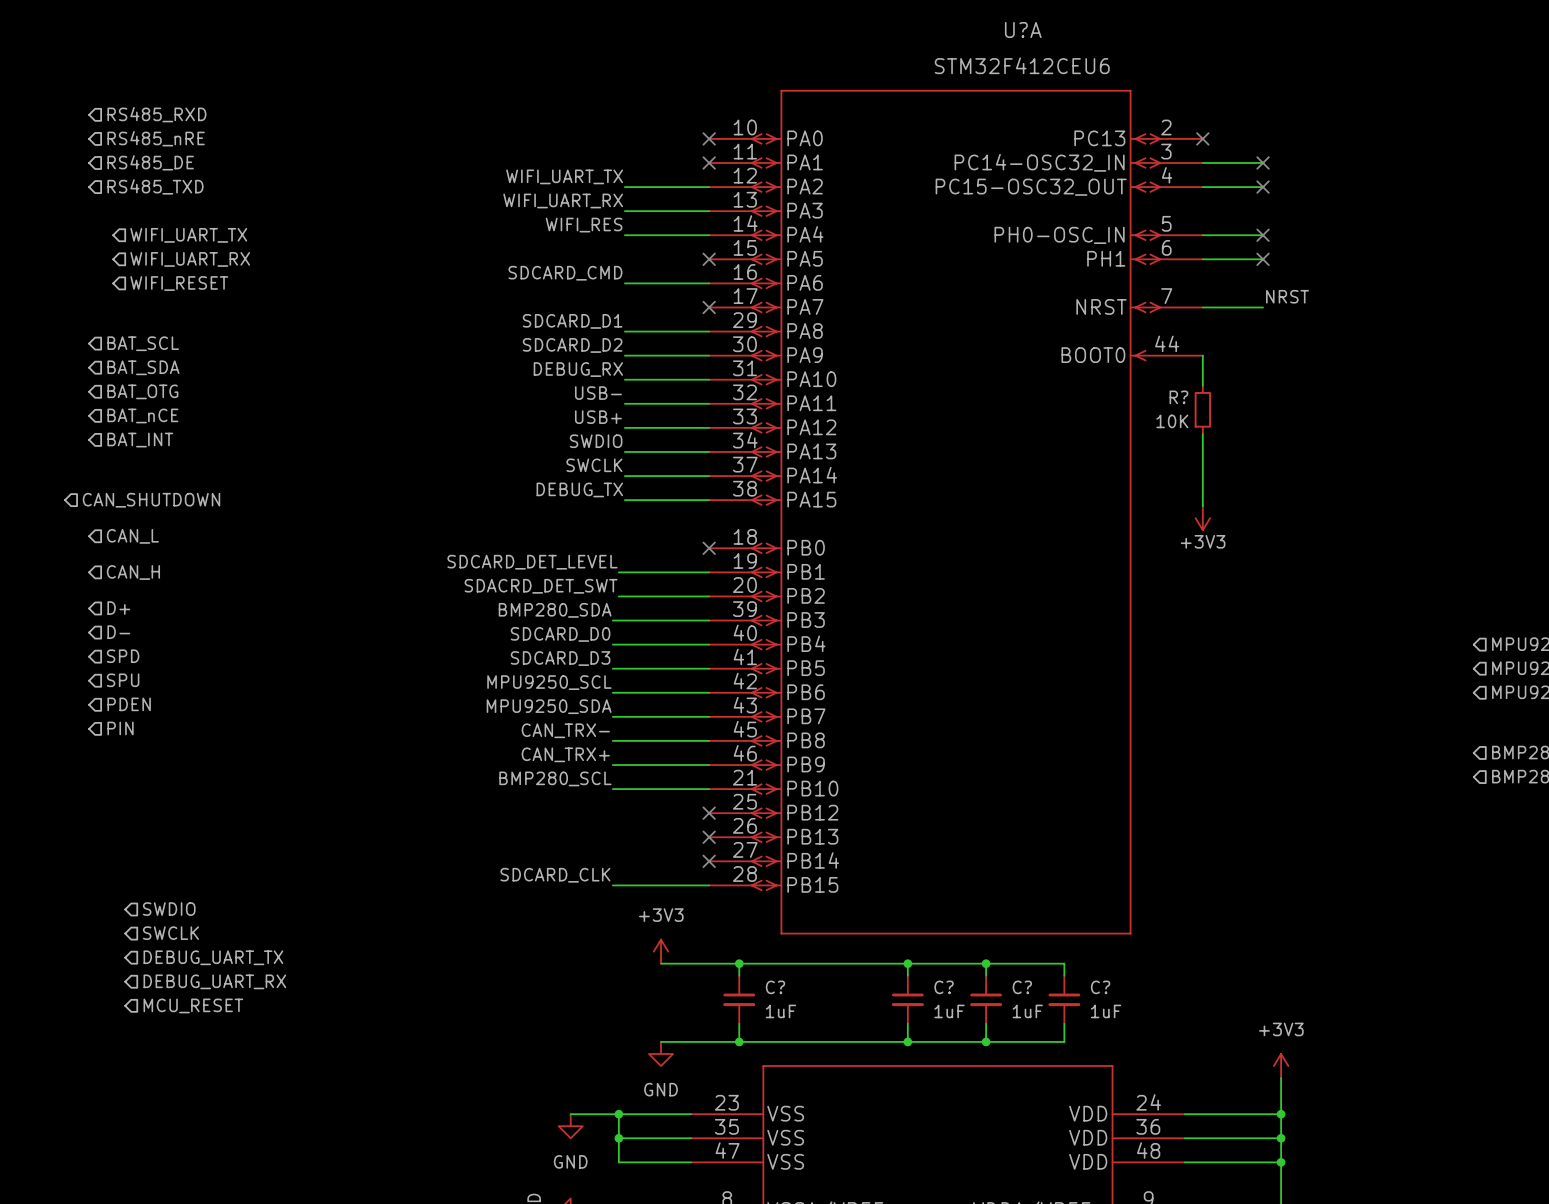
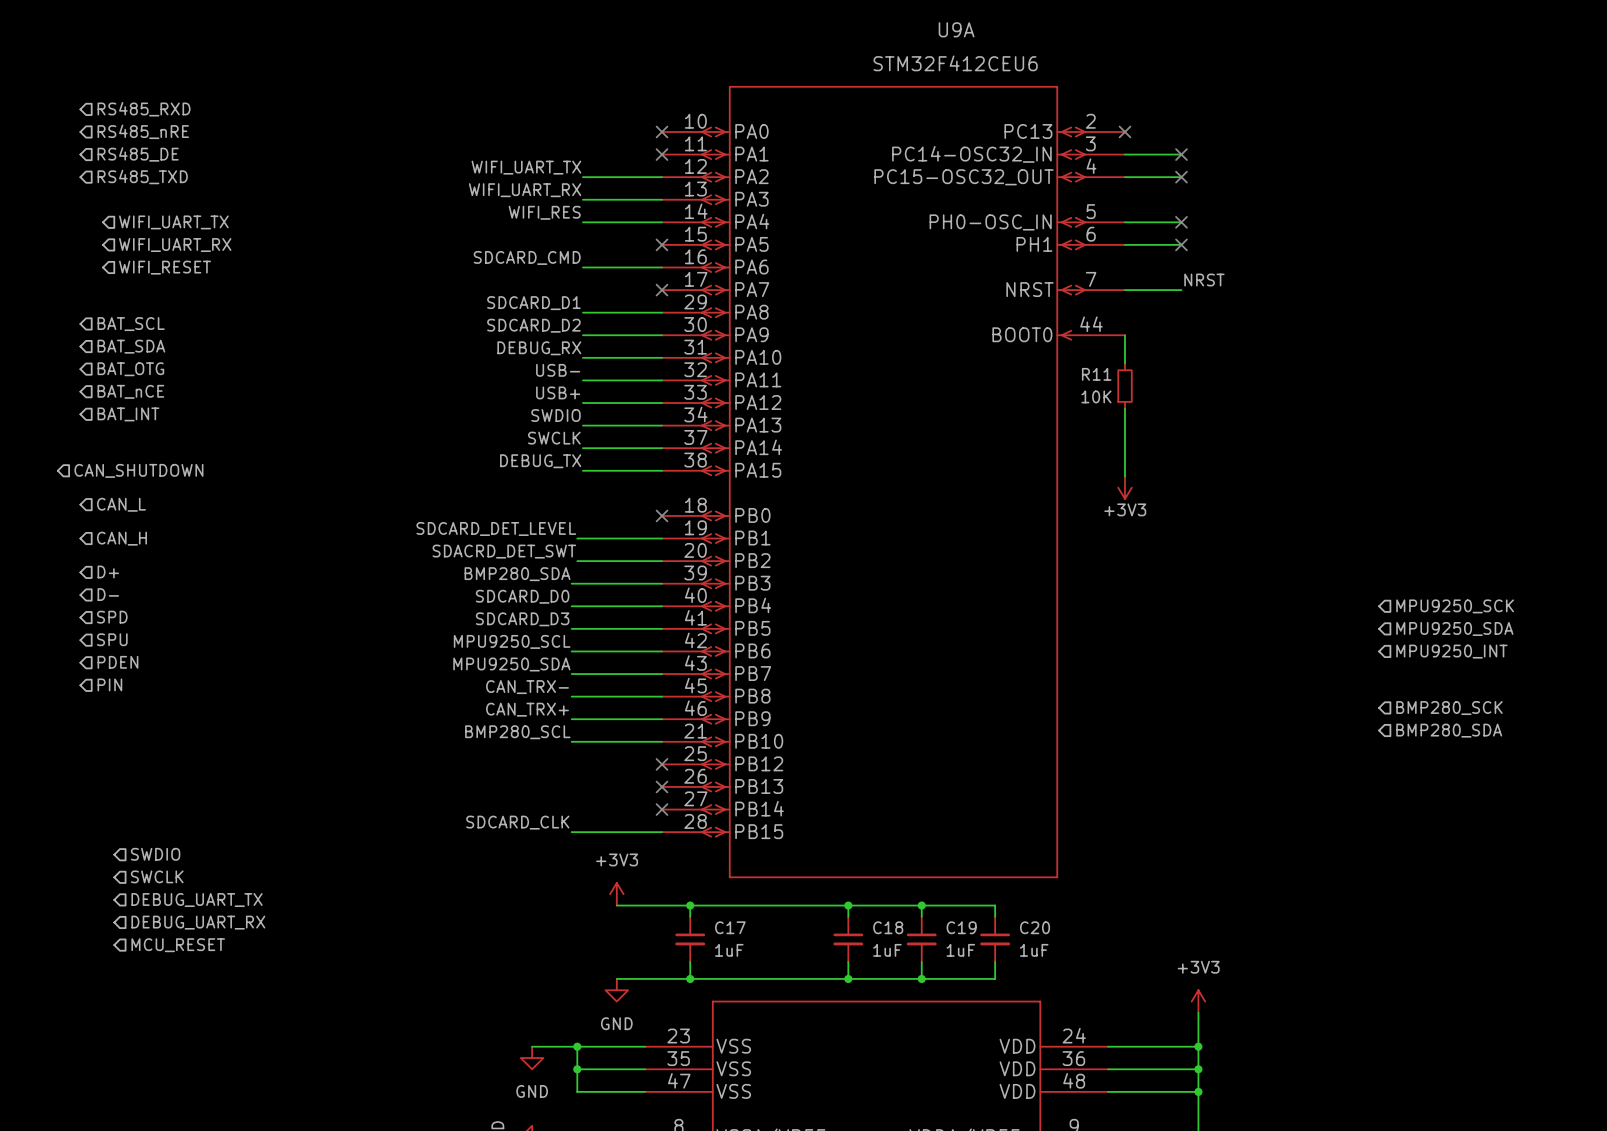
U?A name: U?A (1023, 30) -> U9A (956, 29)
R? name: R? (1178, 397) -> R11 (1096, 374)
C? name: C? (775, 987) -> C17 (730, 927)
C? name: C? (944, 987) -> C18 (888, 927)
C? name: C? (1022, 987) -> C19 (961, 927)
C? name: C? (1100, 987) -> C20 (1035, 927)

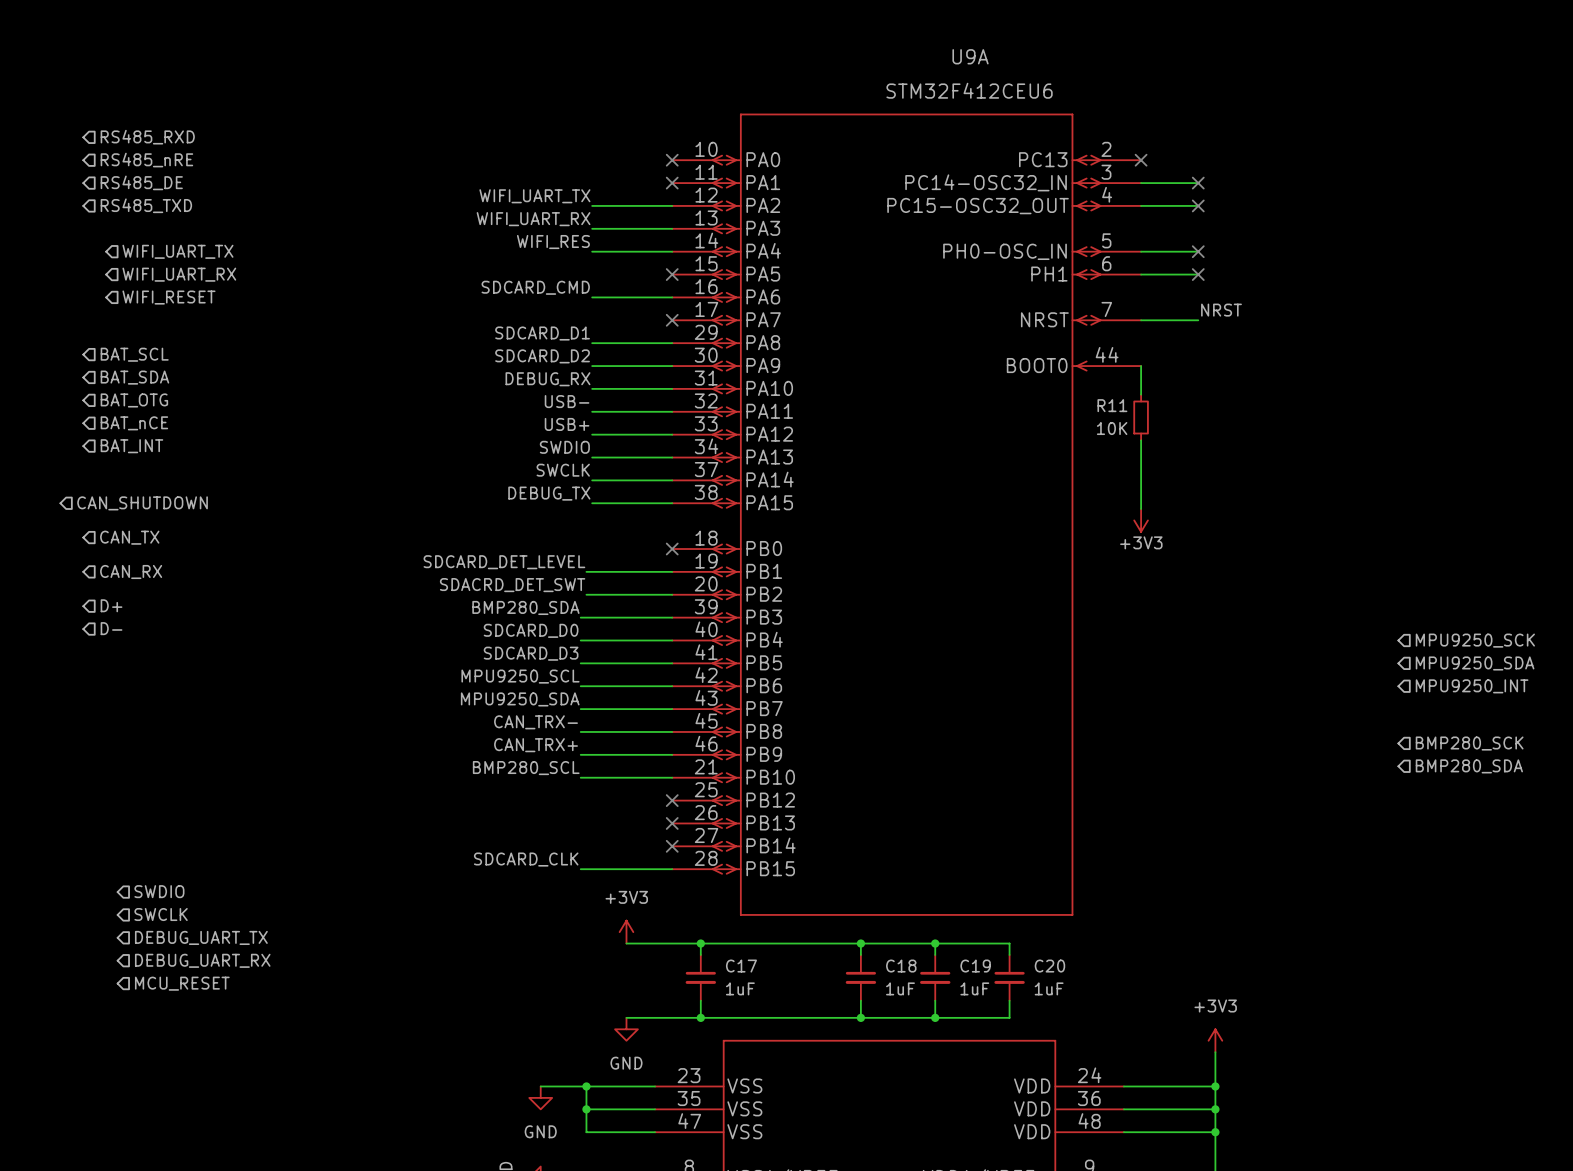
hierarchical label: CAN_L (121, 504) -> CAN_TX (129, 537)
hierarchical label: CAN_H (121, 538) -> CAN_RX (131, 572)
hierarchical label: SPD (112, 617) -> none
hierarchical label: SPU (112, 639) -> none
hierarchical label: PDEN (117, 662) -> none
hierarchical label: PIN (109, 684) -> none

